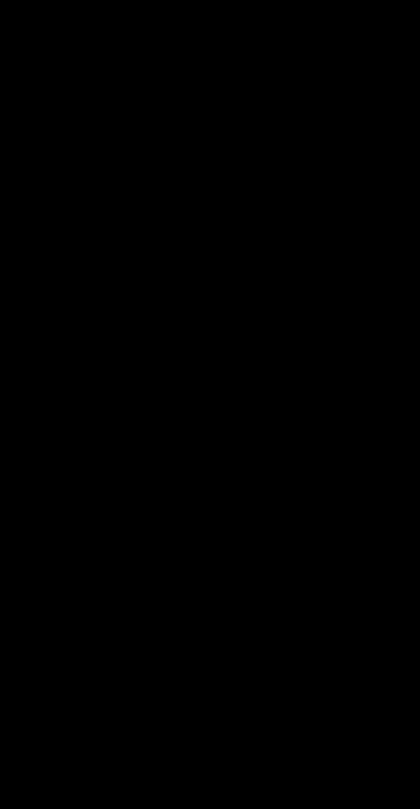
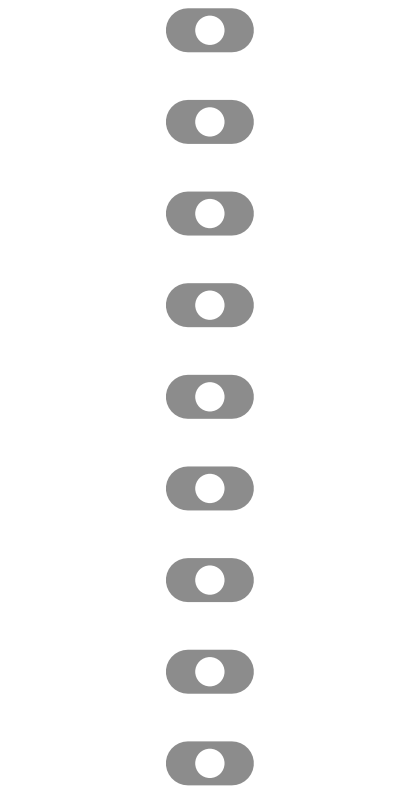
part: none -> (209, 396)

